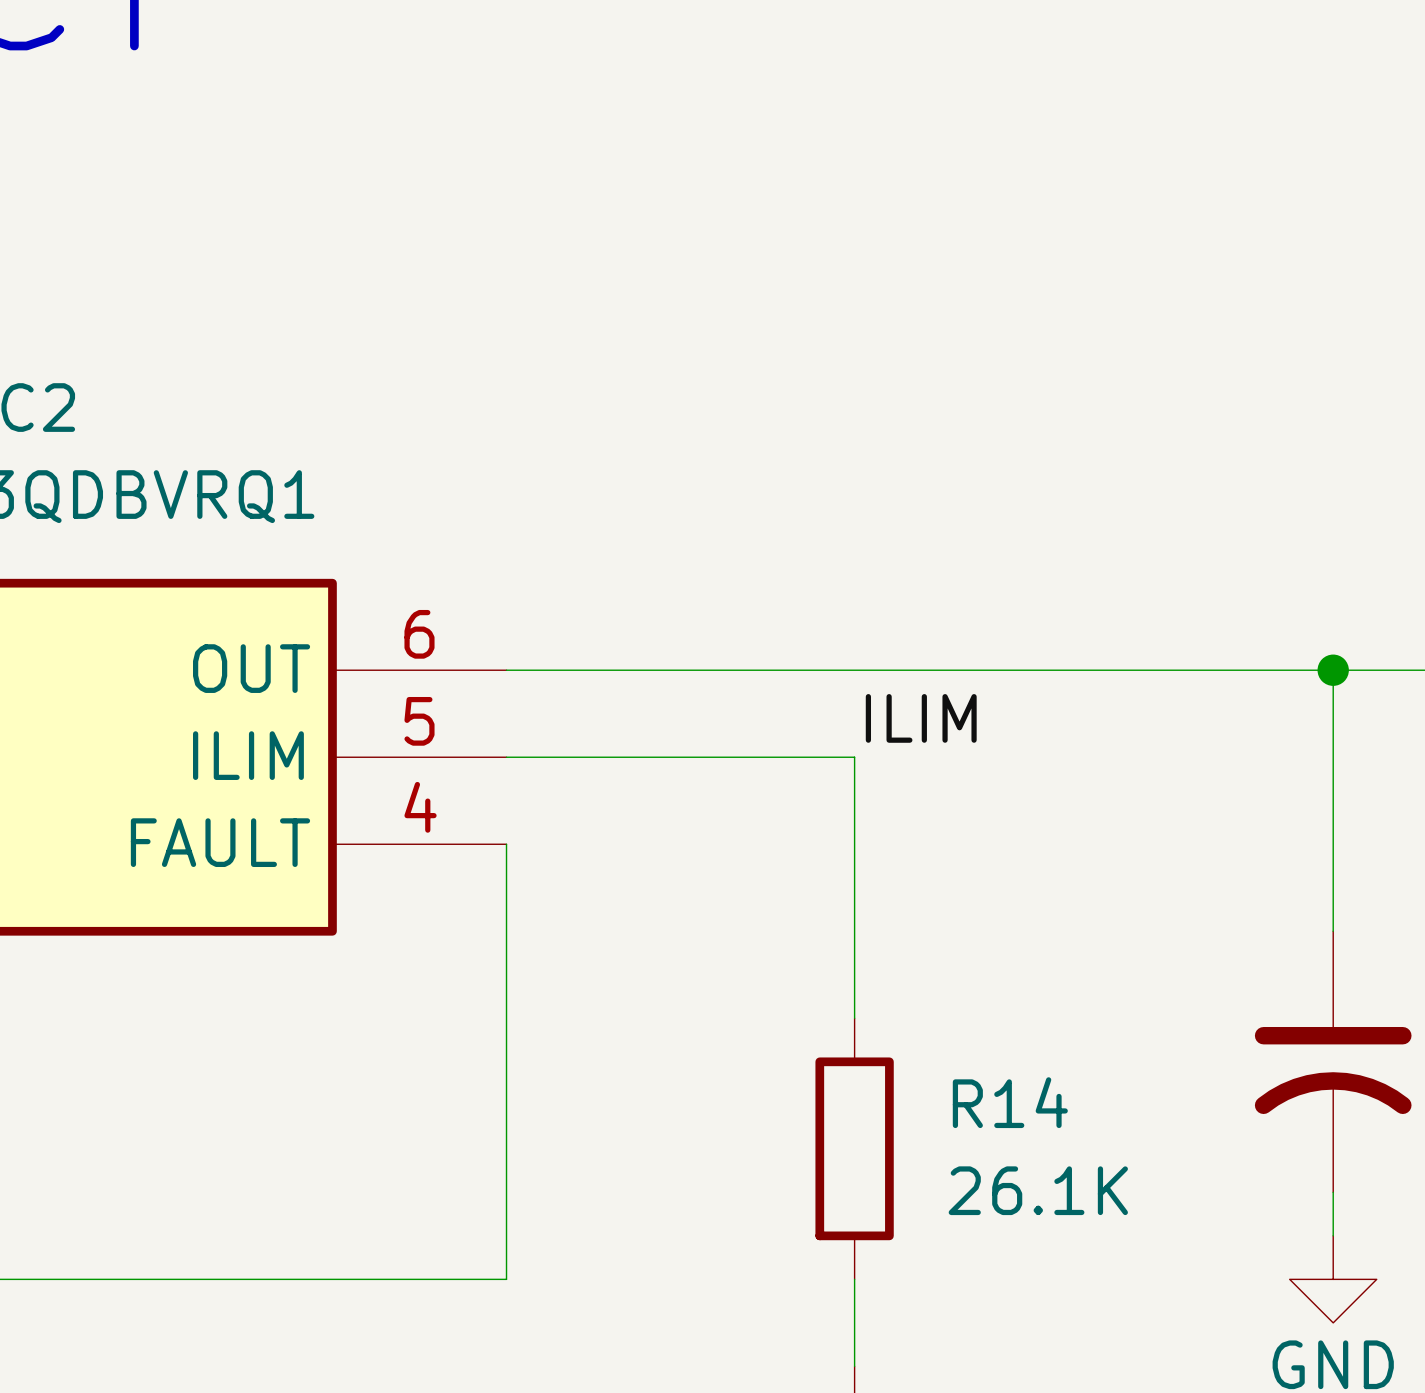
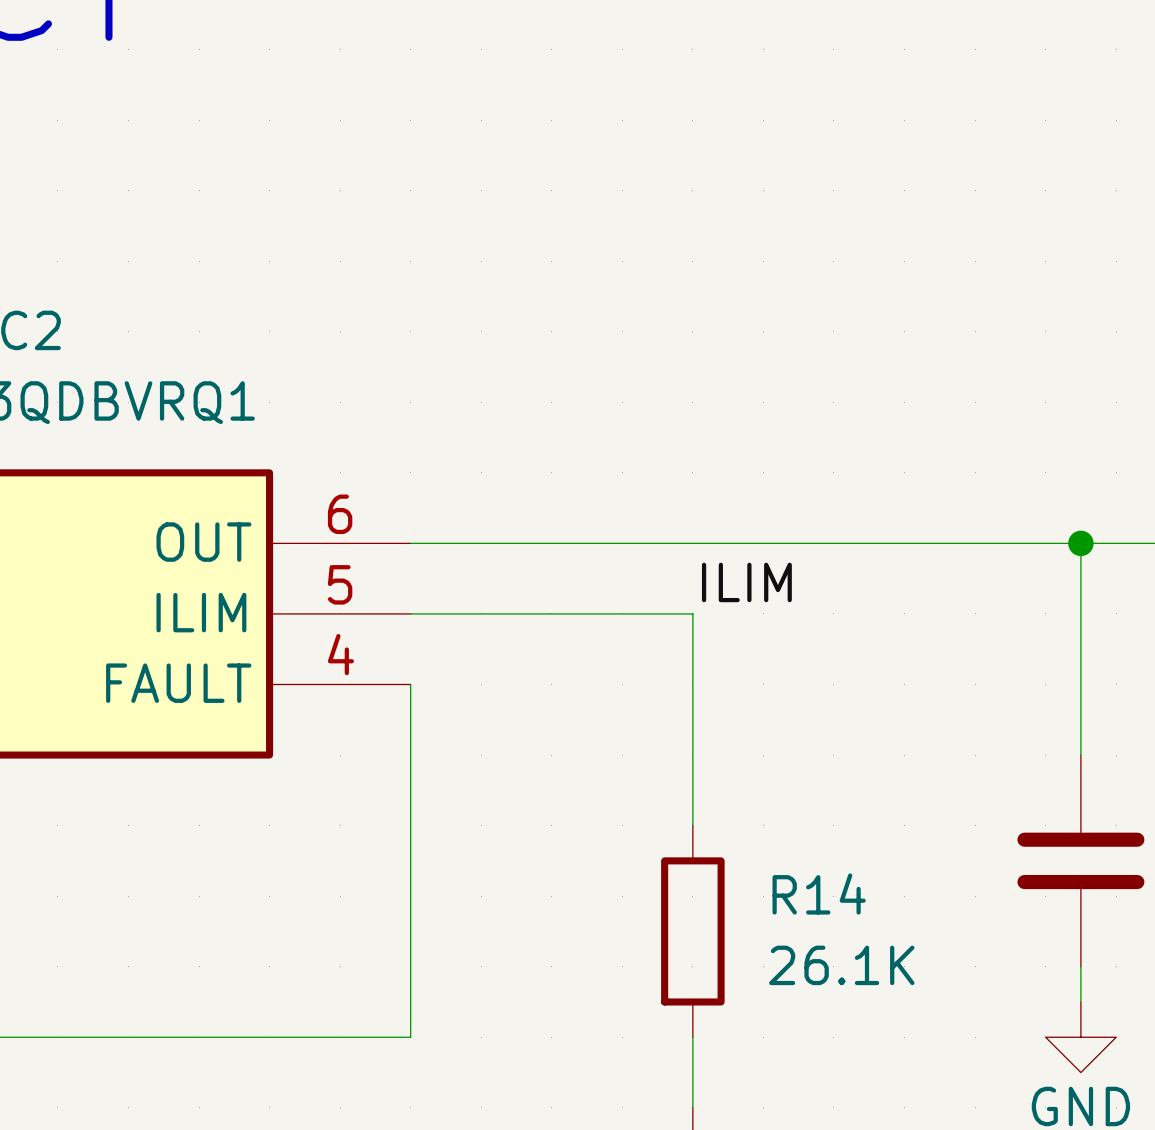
part symbol: [1254, 931, 1412, 1193] -> [1017, 755, 1145, 967]

